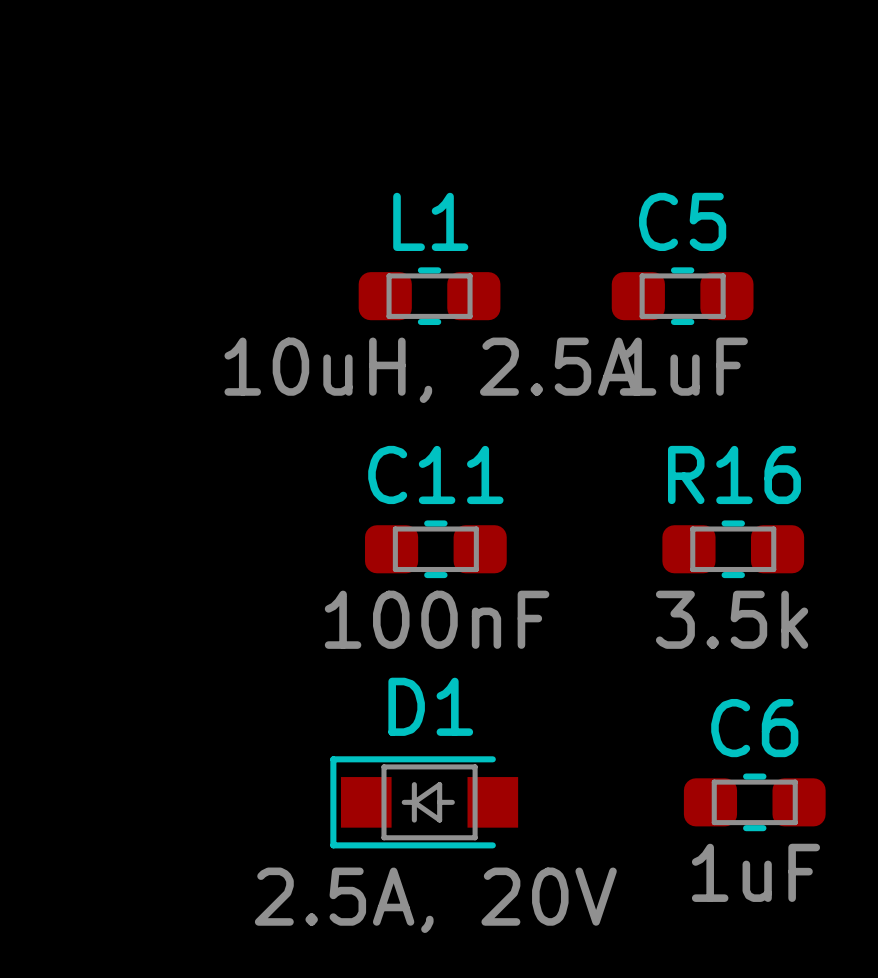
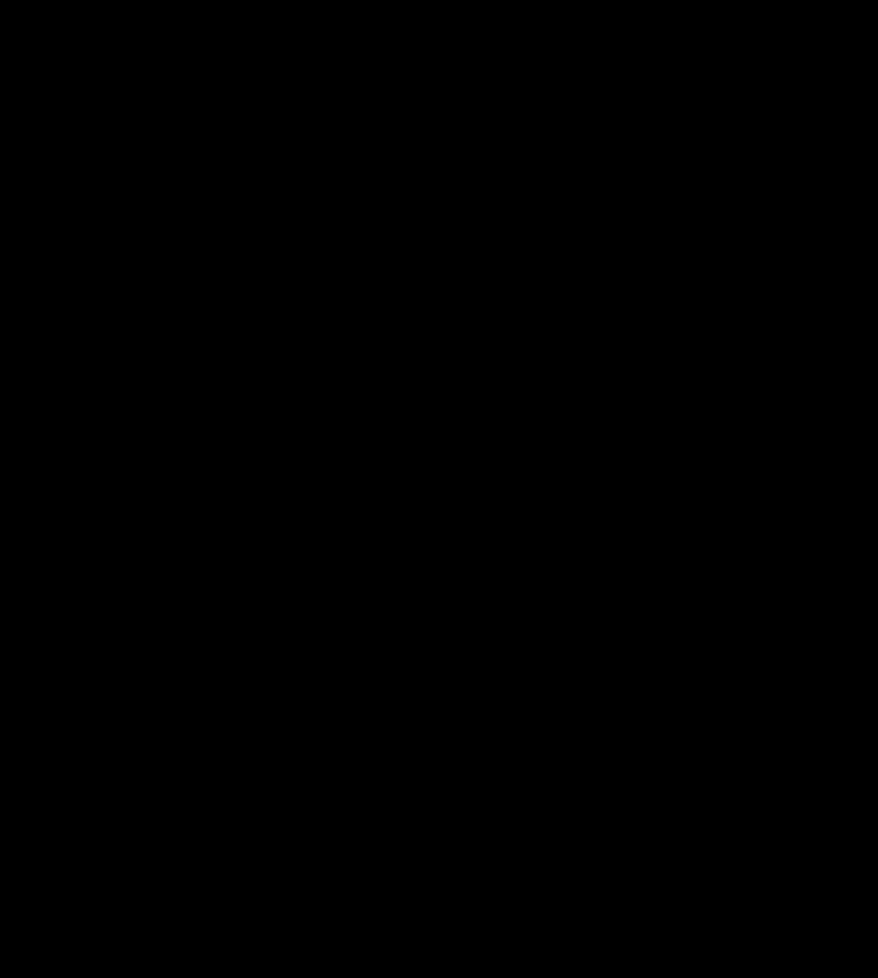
L1: 10uH, 2.5A (429, 296) -> none
C5: 1uF (682, 296) -> none
C11: 100nF (435, 549) -> none
R16: 3.5k (733, 549) -> none
D1: 2.5A, 20V (424, 802) -> none
C6: 1uF (754, 802) -> none

